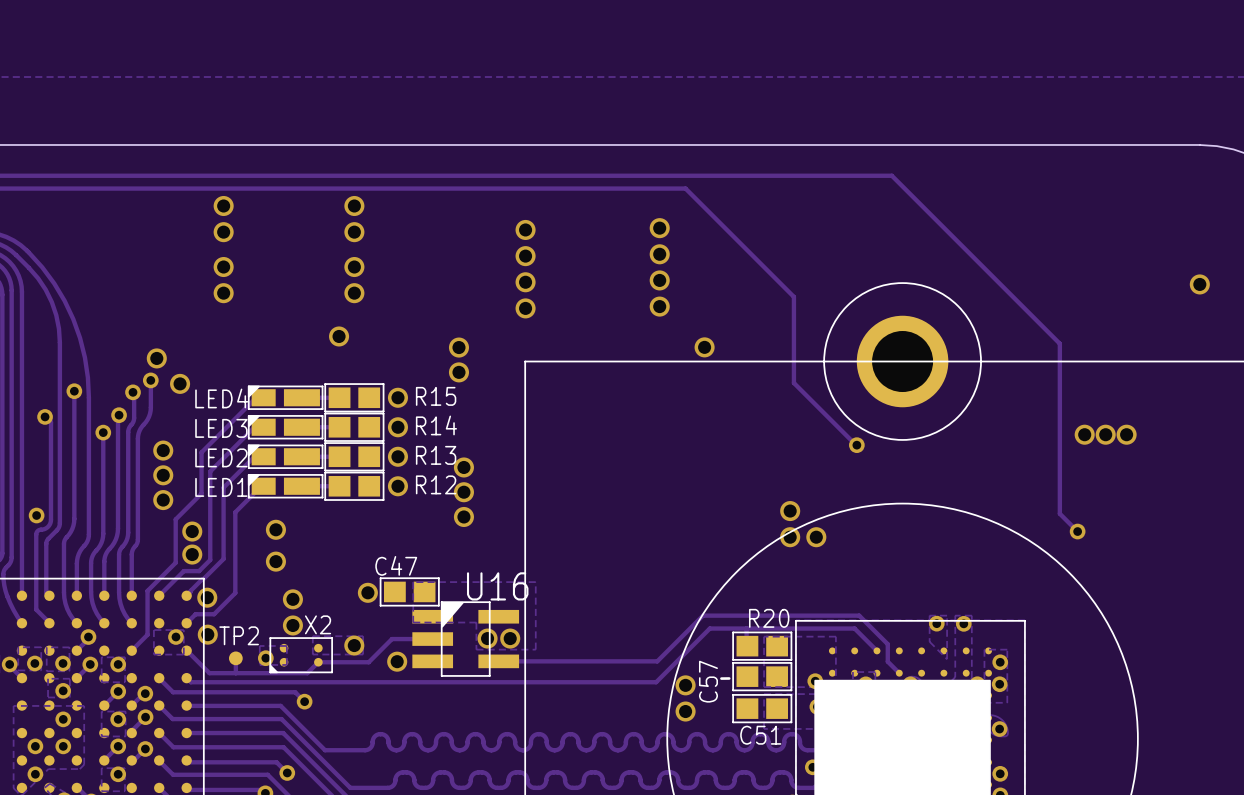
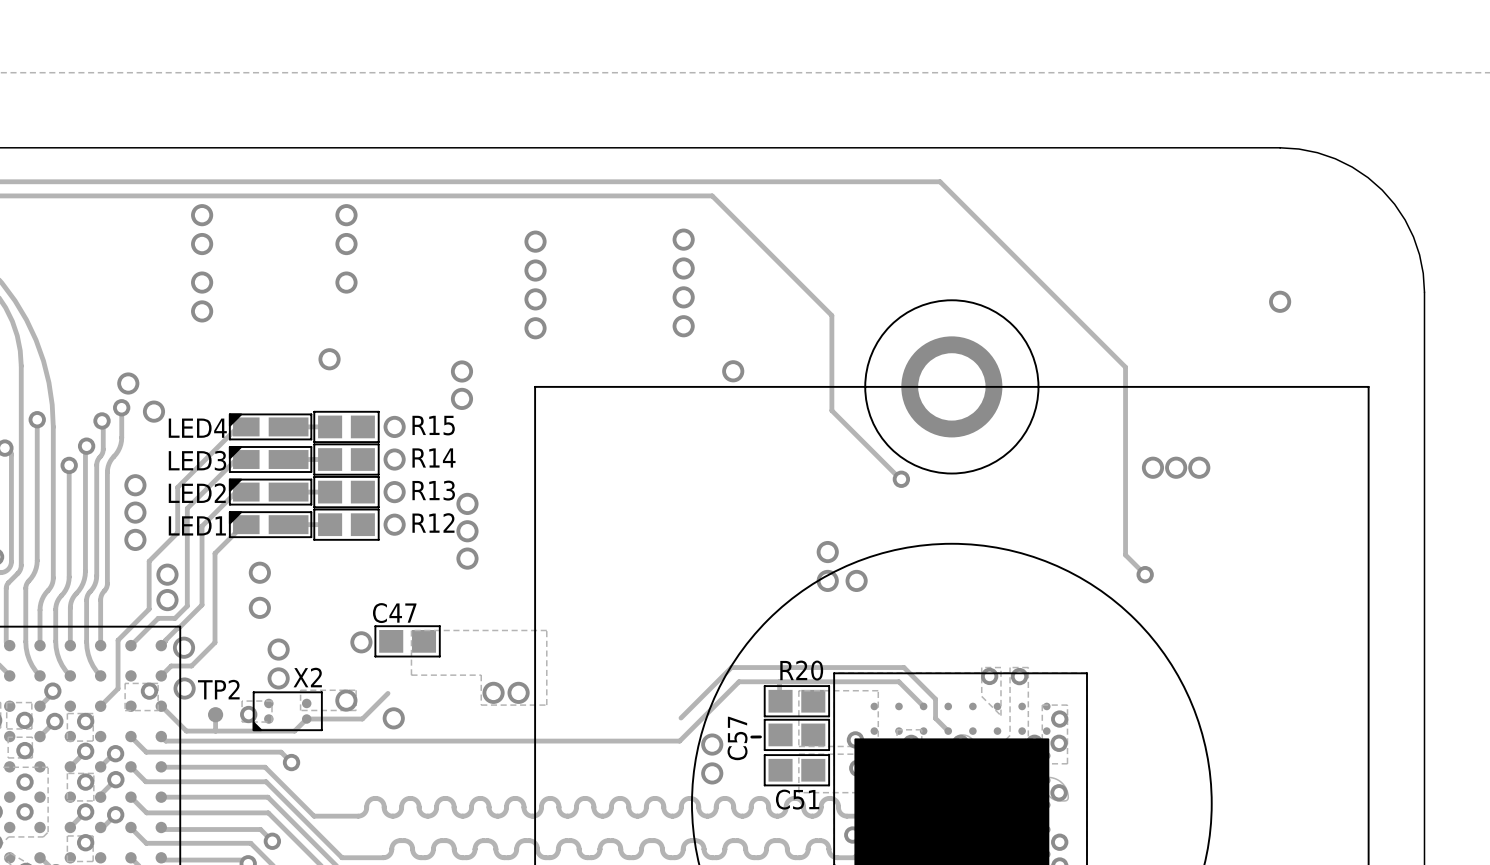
via: (354, 293) -> none
track: (391, 639) (432, 639) -> none
U16: (465, 639) -> none
track: (498, 661) (657, 661) -> none

